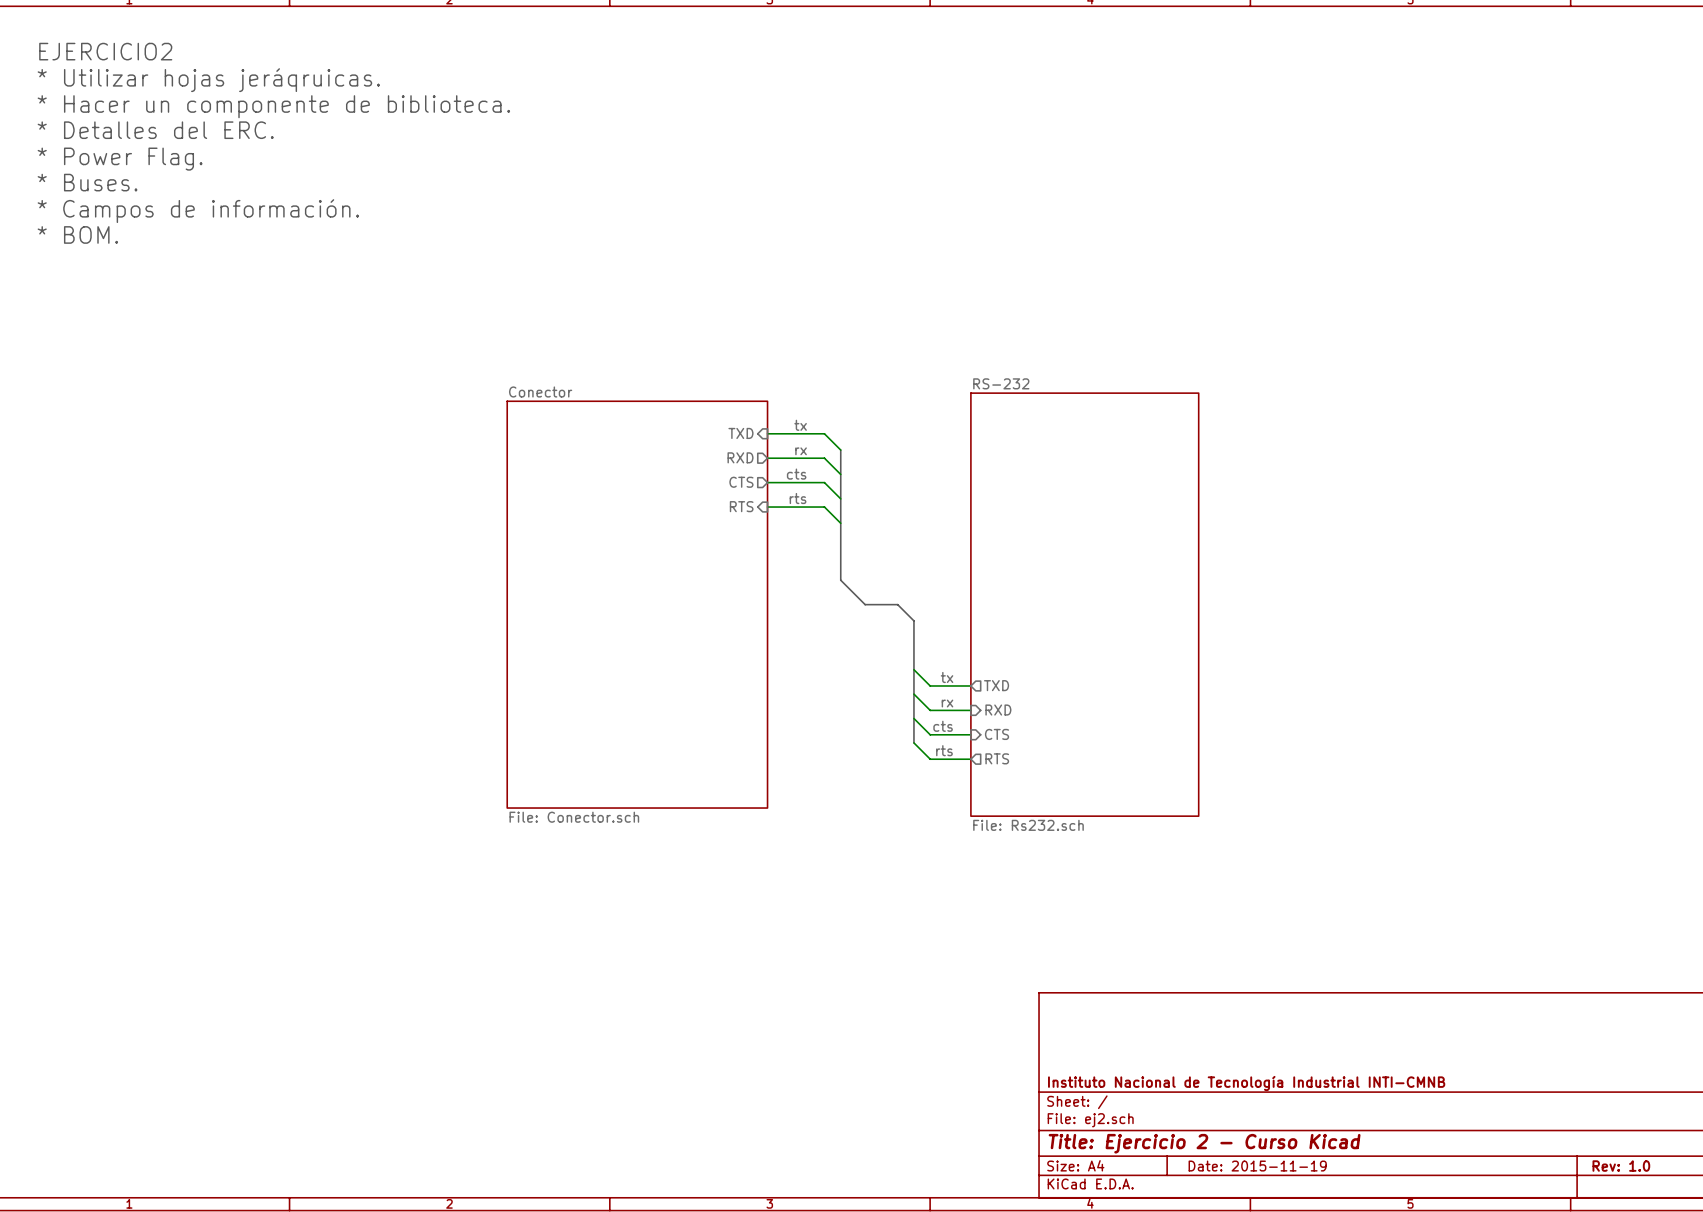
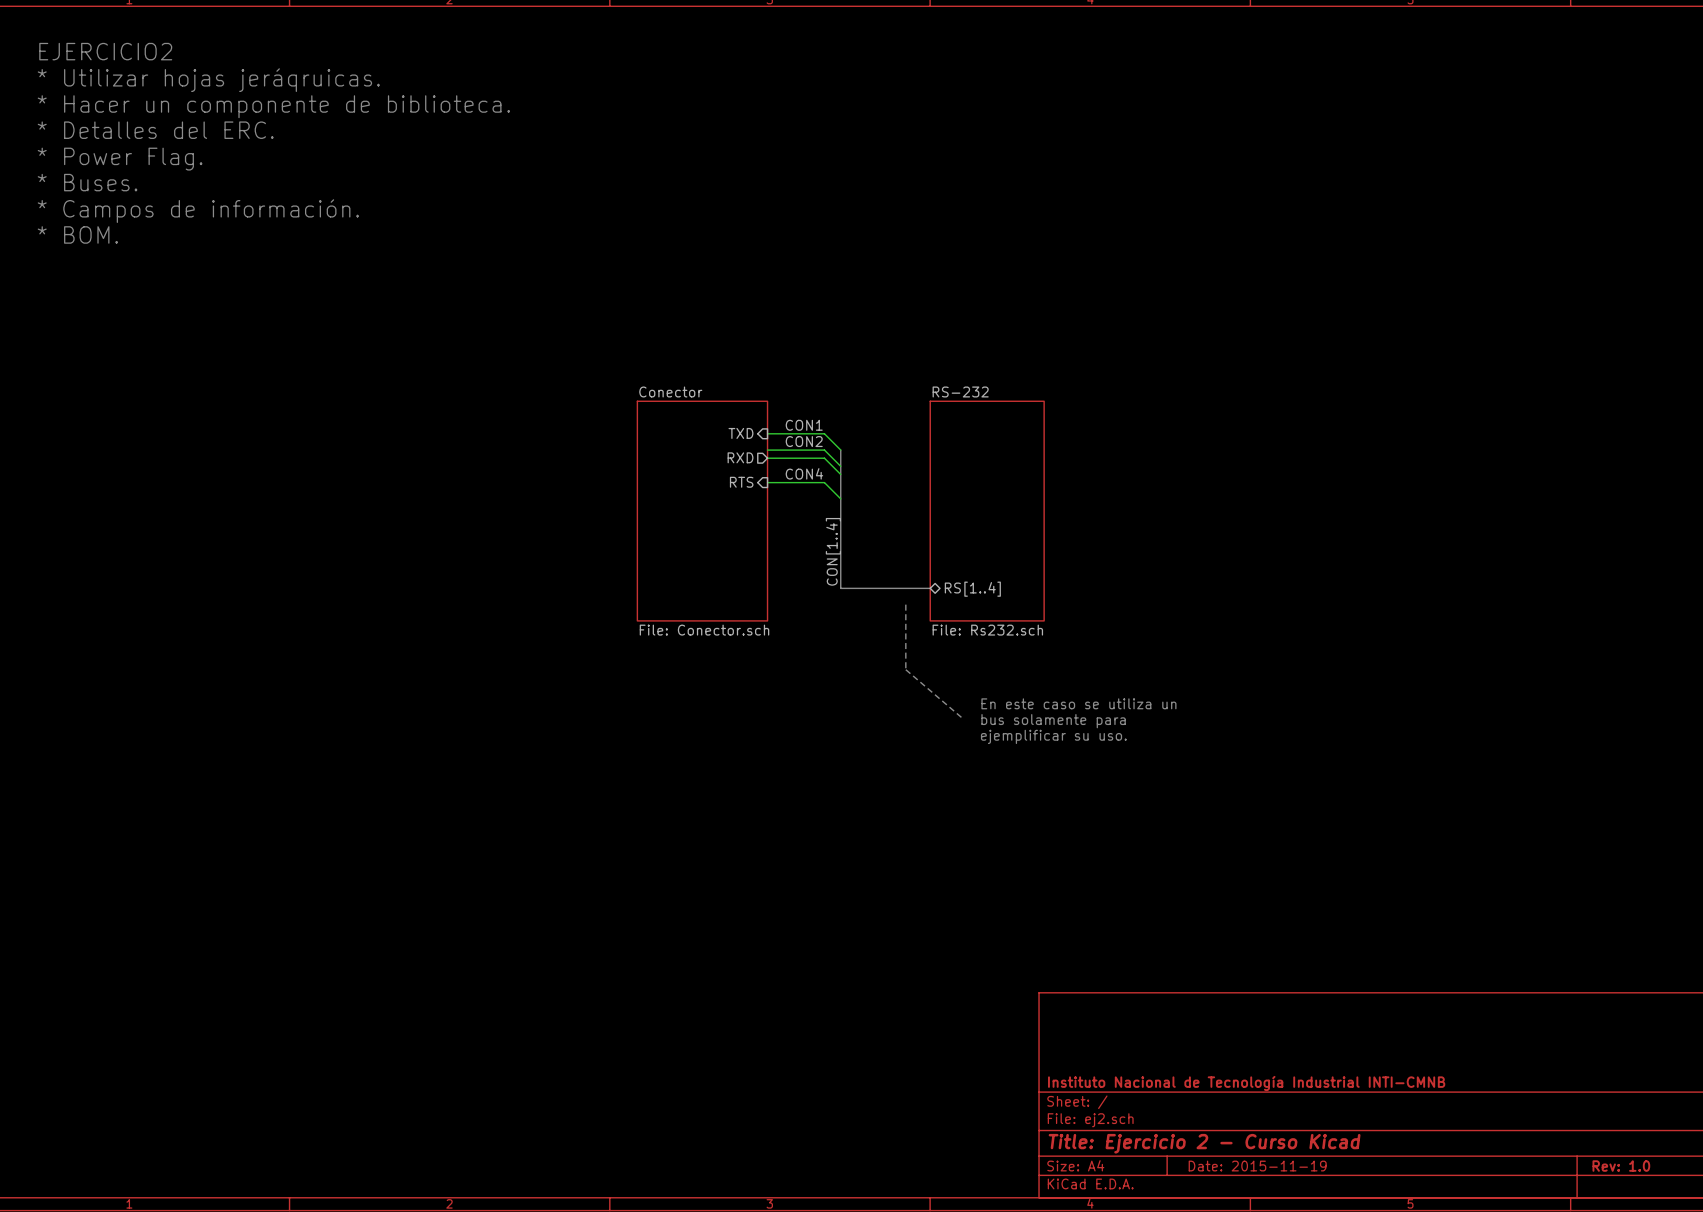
sheet RS-232 name position: RS-232 (1001, 383) -> RS-232 (960, 391)
sheet RS-232 shape: [970, 393, 1199, 817] -> [930, 401, 1045, 621]
label: tx (800, 425) -> none
label: none -> CON1 (804, 425)
label: none -> CON2 (804, 441)
label: rx (801, 451) -> none
label: none -> CON4 (804, 473)
label: cts (796, 474) -> none
sheet pin shape: output (741, 482) -> input (741, 482)
sheet pin: CTS (741, 482) -> RTS (741, 482)
label: rts (798, 498) -> none
sheet pin: RTS (741, 506) -> none
wire: (767, 507) (824, 507) (840, 523) -> (767, 450) (824, 450) (840, 466)
sheet Conector: none -> File: Conector.sch (702, 511)
label: none -> CON[1..4] (833, 551)
bus: (840, 580) (865, 604) (897, 604) (913, 620) (913, 742) -> (840, 580) (840, 588) (930, 588)
sheet pin: none -> RS[1..4] (972, 589)
sheet Conector: File: Conector.sch (637, 604) -> none
line: none -> (905, 604) (905, 669) (962, 718)
wire: (913, 669) (930, 685) (970, 685) -> none
label: tx (947, 677) -> none
sheet pin: TXD (996, 685) -> none
wire: (913, 694) (930, 710) (970, 710) -> none
label: rx (947, 703) -> none
text: none -> En este caso se utiliza un (1078, 703)
sheet pin: RXD (998, 710) -> none
wire: (913, 718) (930, 734) (970, 734) -> none
text: none -> bus solamente para (1053, 721)
label: cts (943, 726) -> none
sheet pin: CTS (997, 734) -> none
text: none -> ejemplificar su uso. (1053, 736)
wire: (913, 742) (930, 759) (970, 759) -> none
label: rts (944, 750) -> none
sheet pin: RTS (997, 758) -> none
sheet RS-232 value position: File: Rs232.sch (1028, 825) -> File: Rs232.sch (987, 630)

